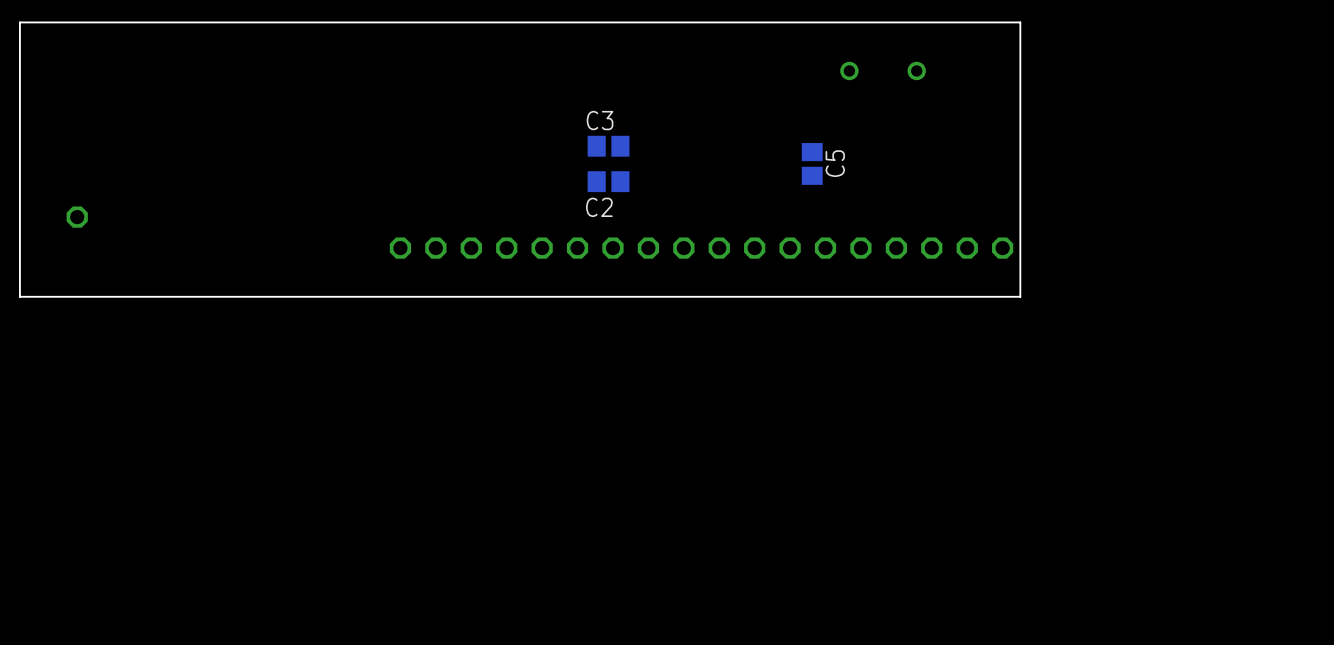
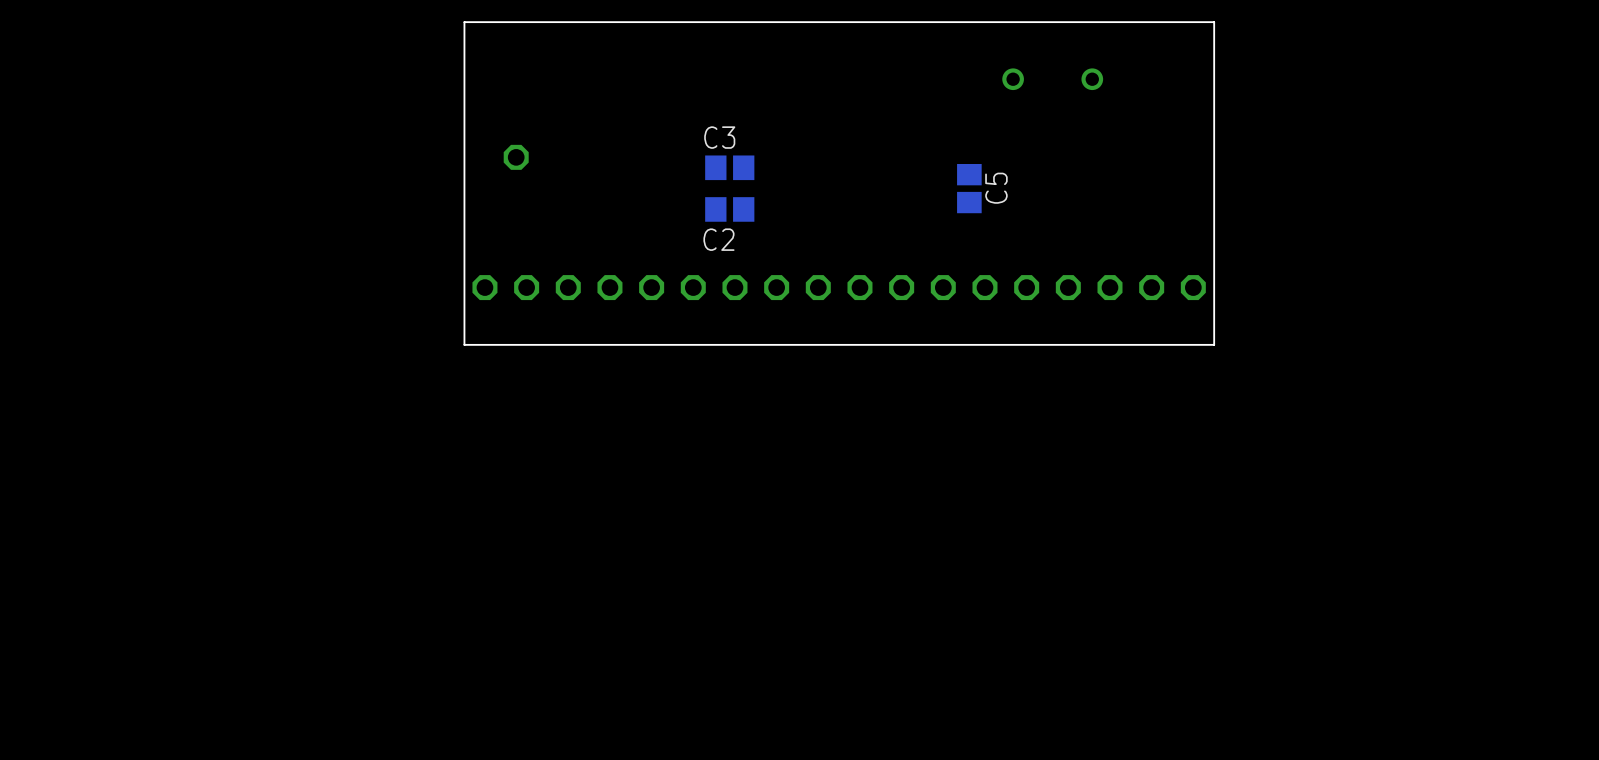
board edge: (383, 22) (19, 22) (19, 296) (383, 296) -> (464, 22) (464, 344)
part: none -> (516, 157)
part: (77, 217) -> none

